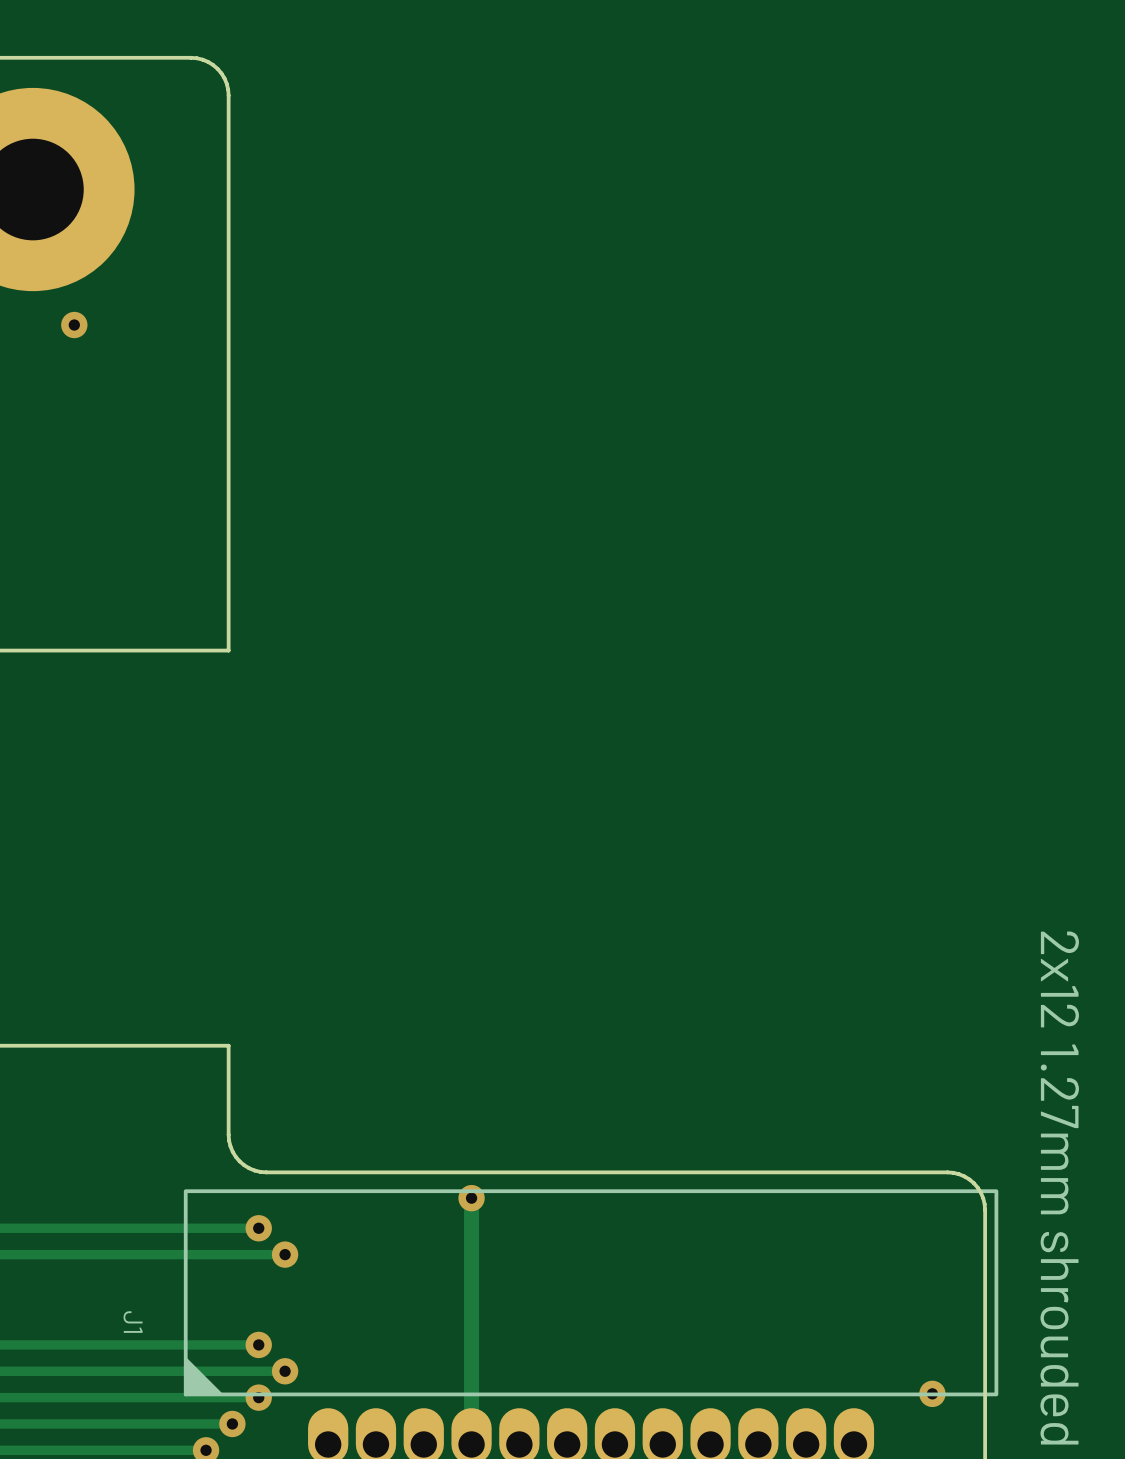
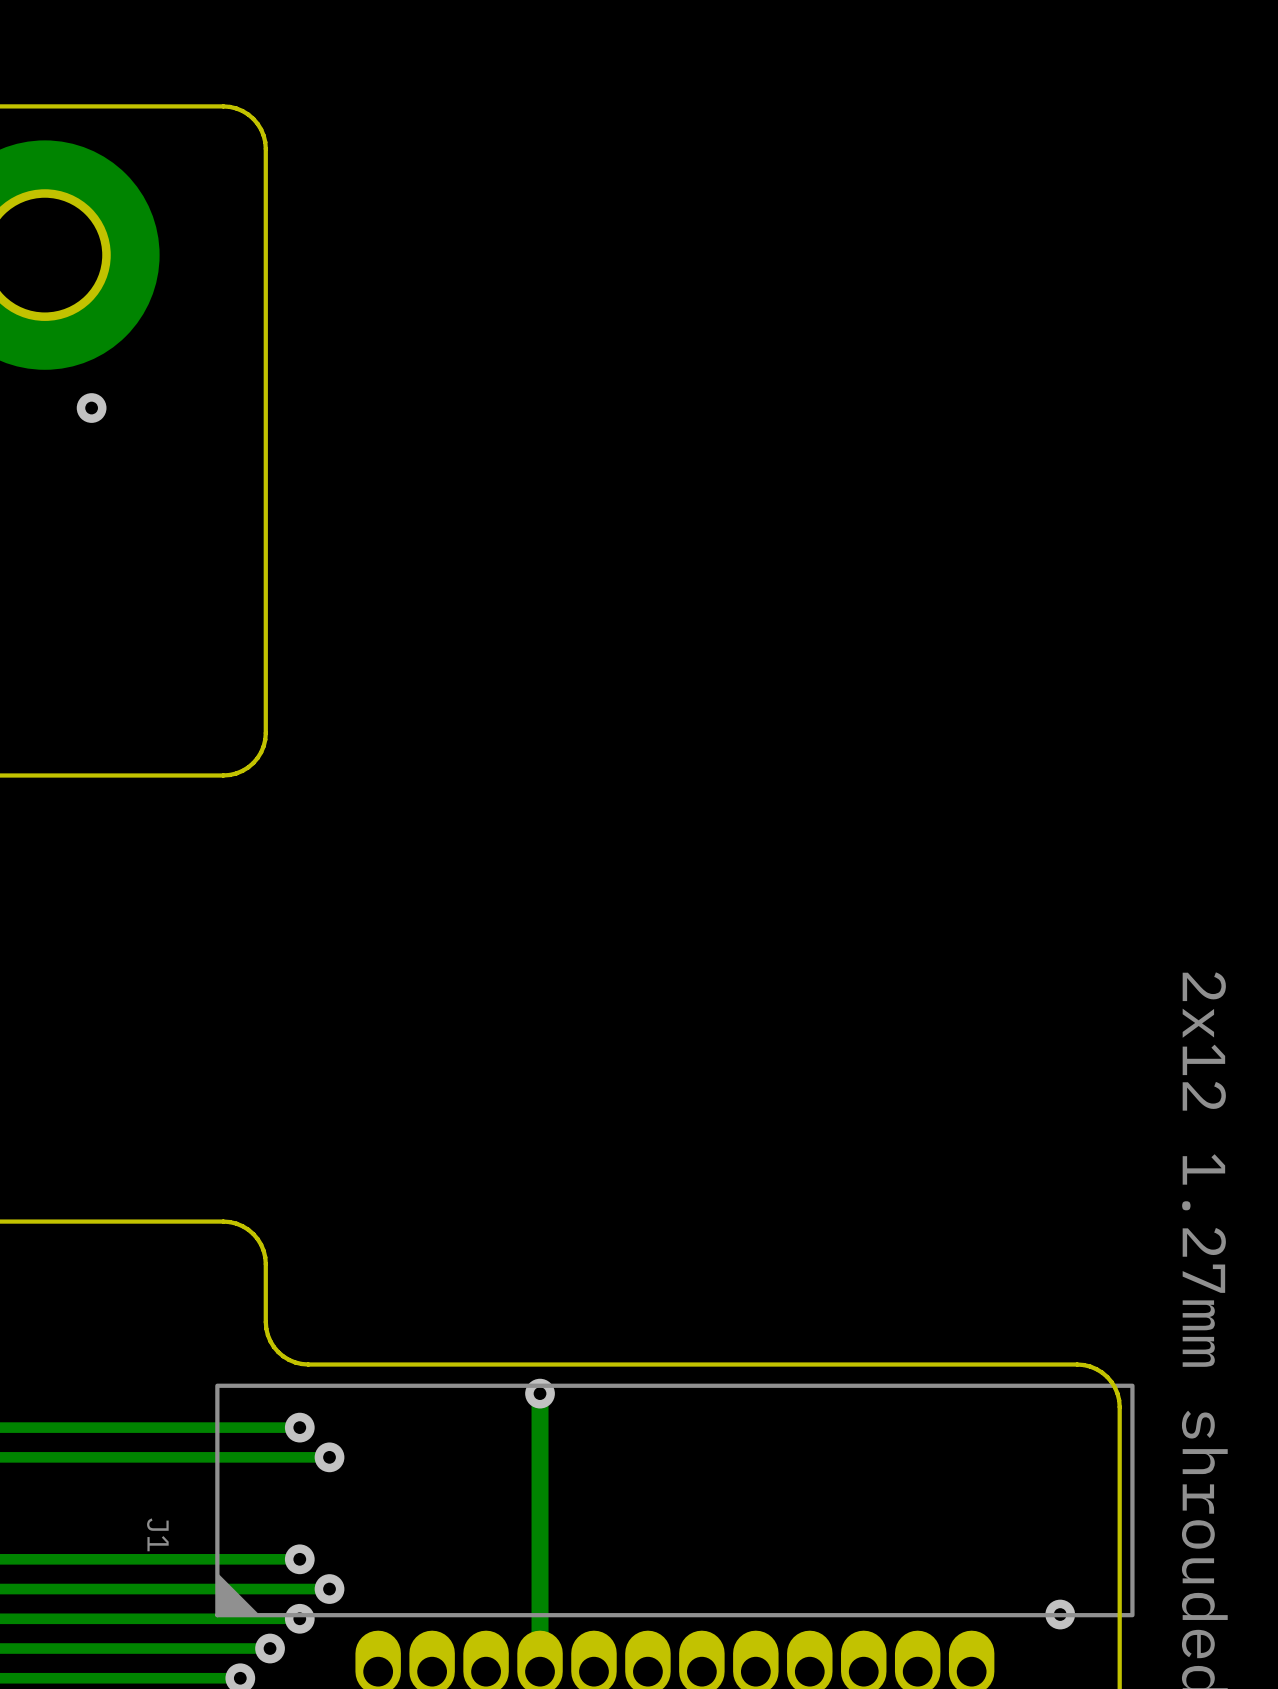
board edge: (228, 612) (228, 650) (190, 650) -> (265, 733) (261, 752) (253, 763) (242, 770) (223, 775)
board edge: (190, 1045) (228, 1045) (228, 1083) -> (223, 1221) (242, 1226) (253, 1234) (261, 1244) (265, 1264)

